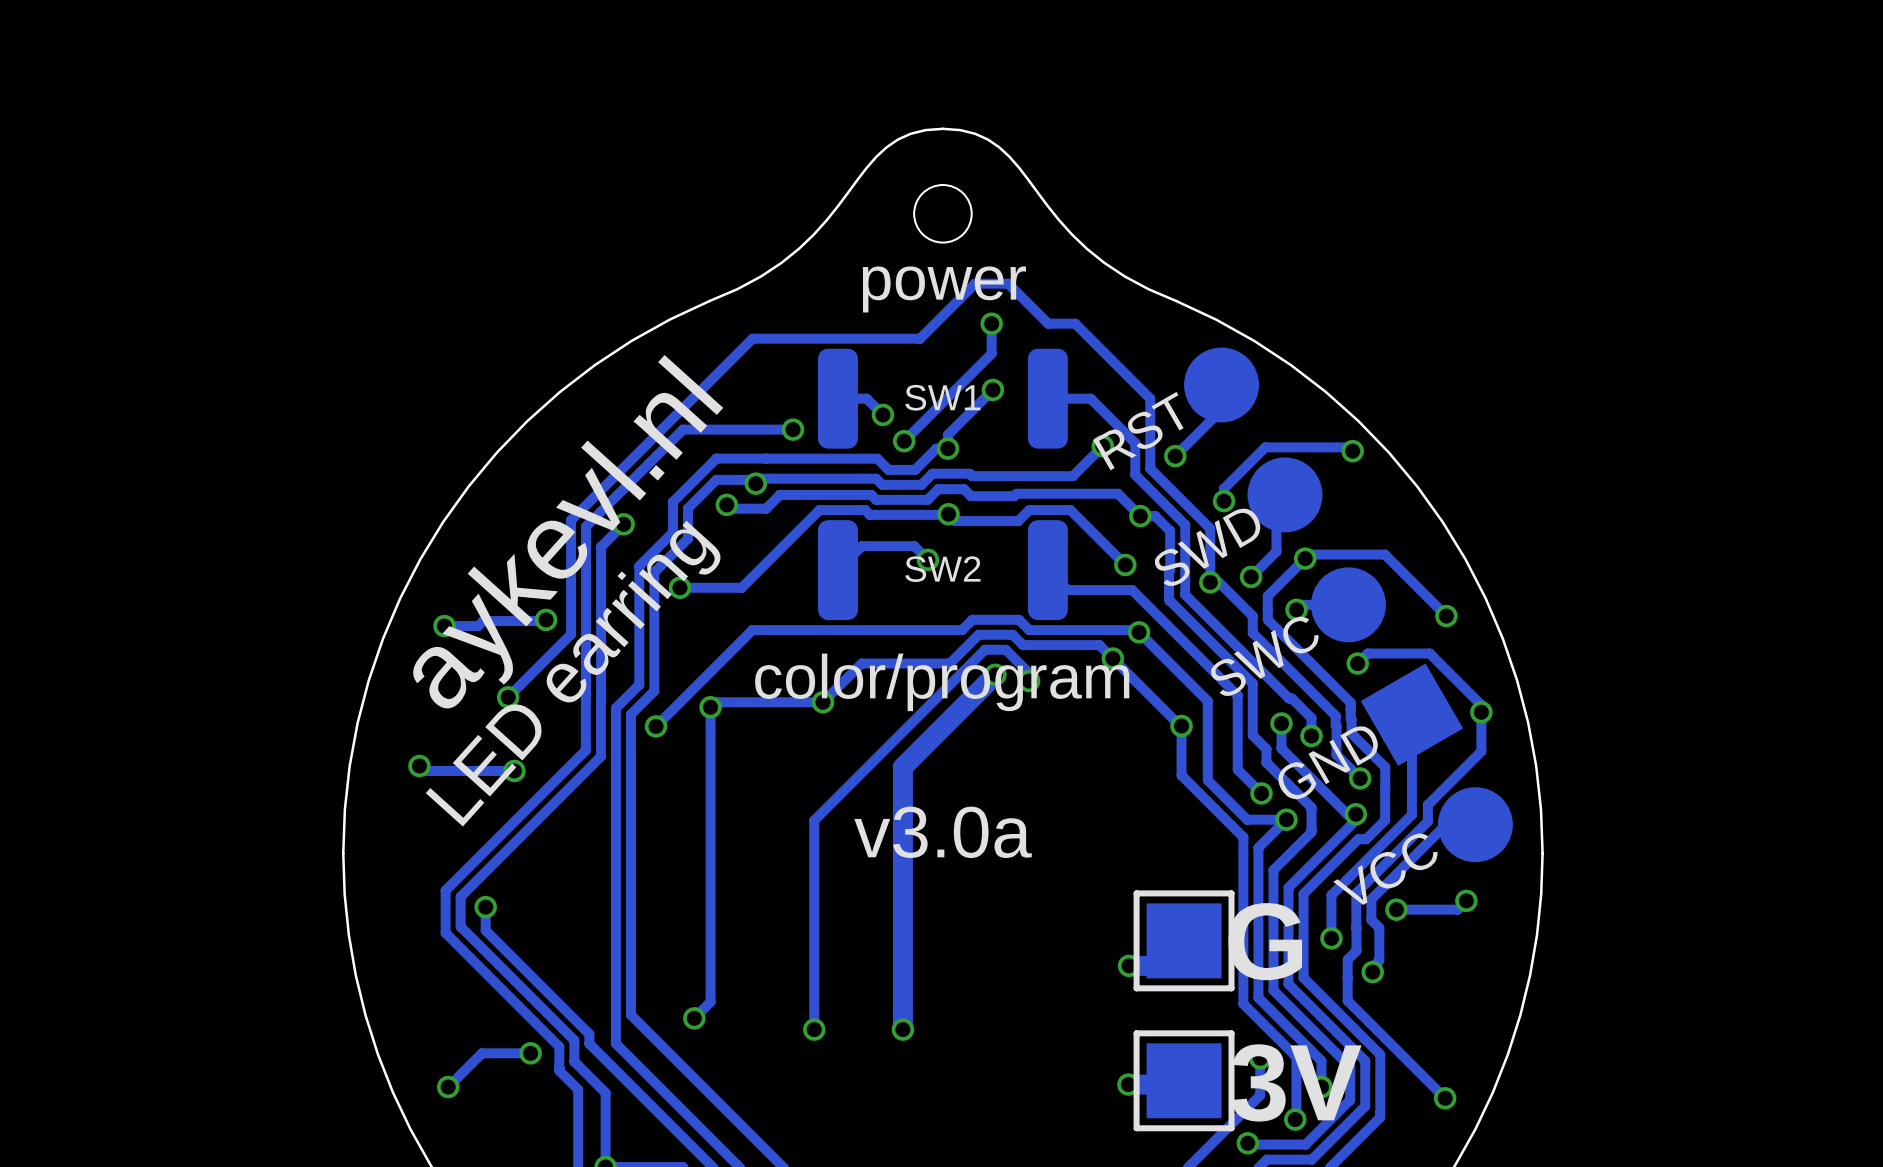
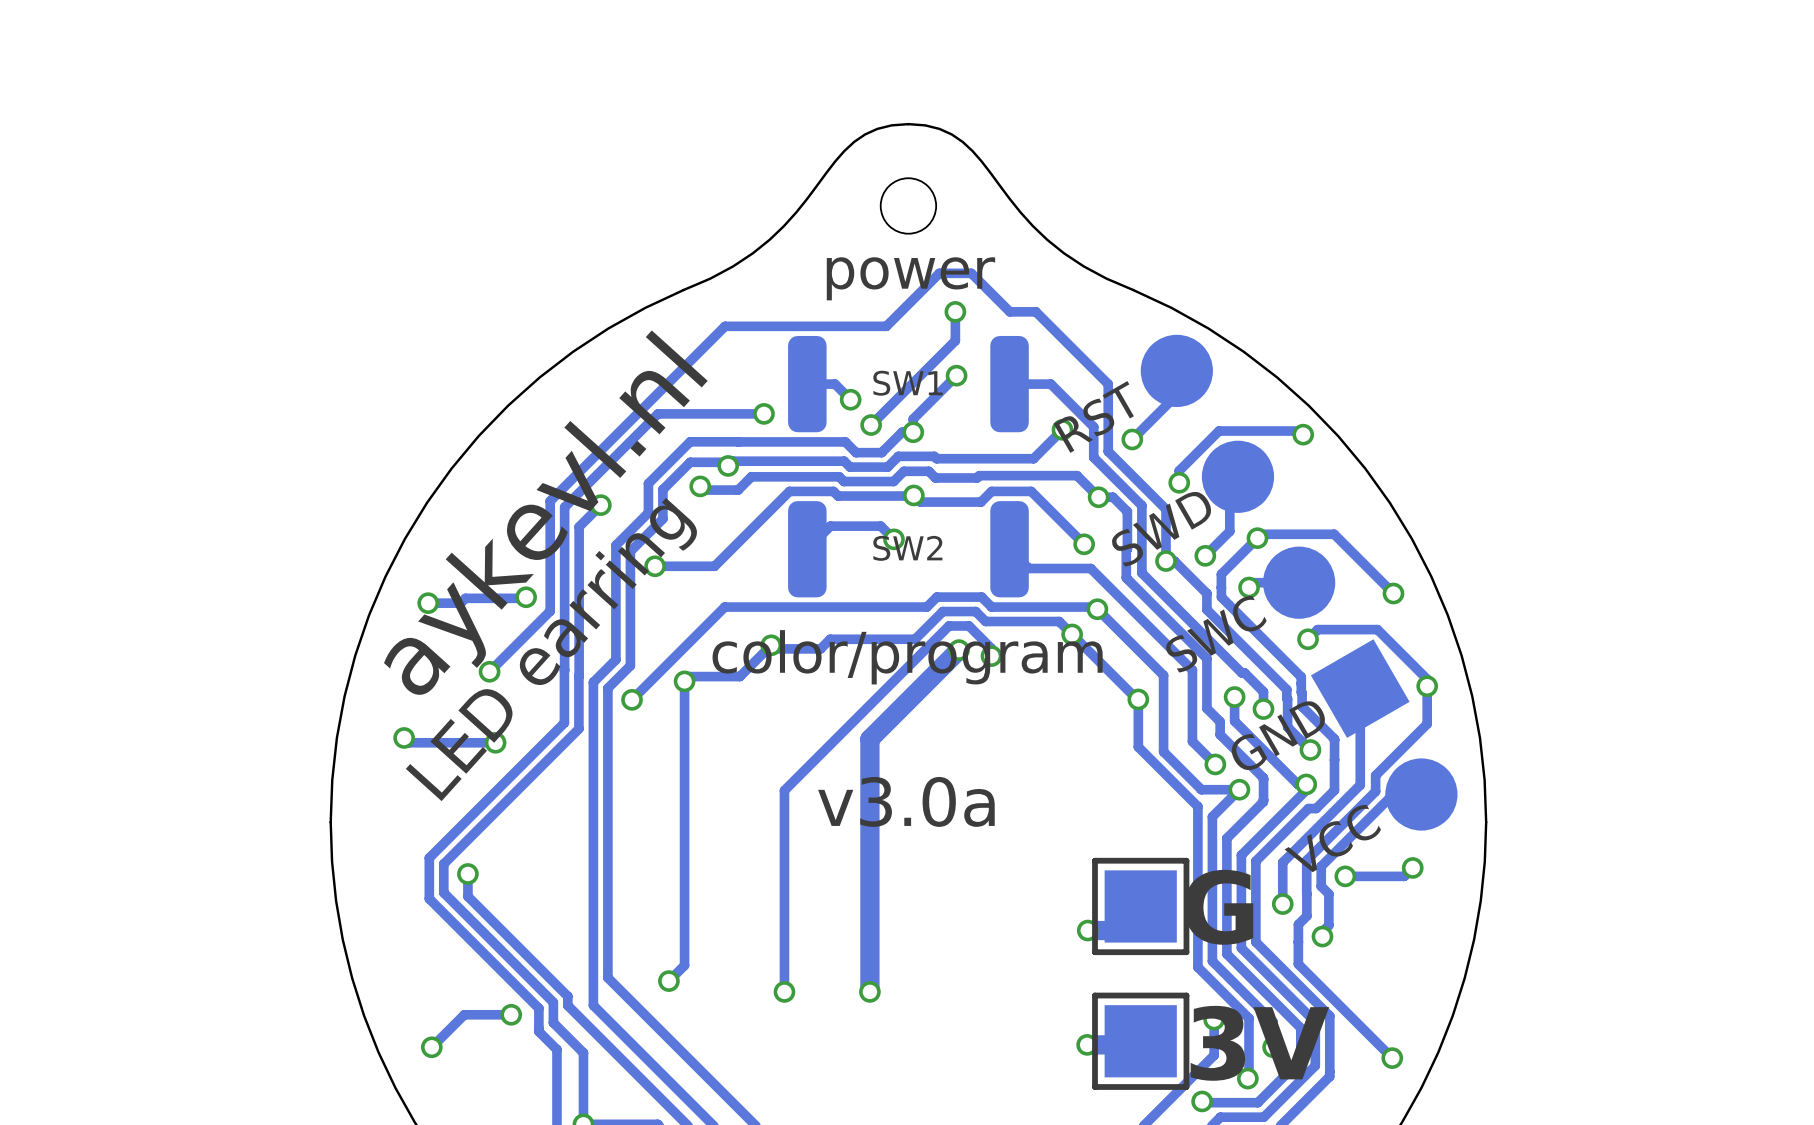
track: (851, 673) (823, 702) (768, 702) -> (820, 648) (774, 648) (771, 645) (739, 676)
via position: (823, 702) -> (771, 645)

